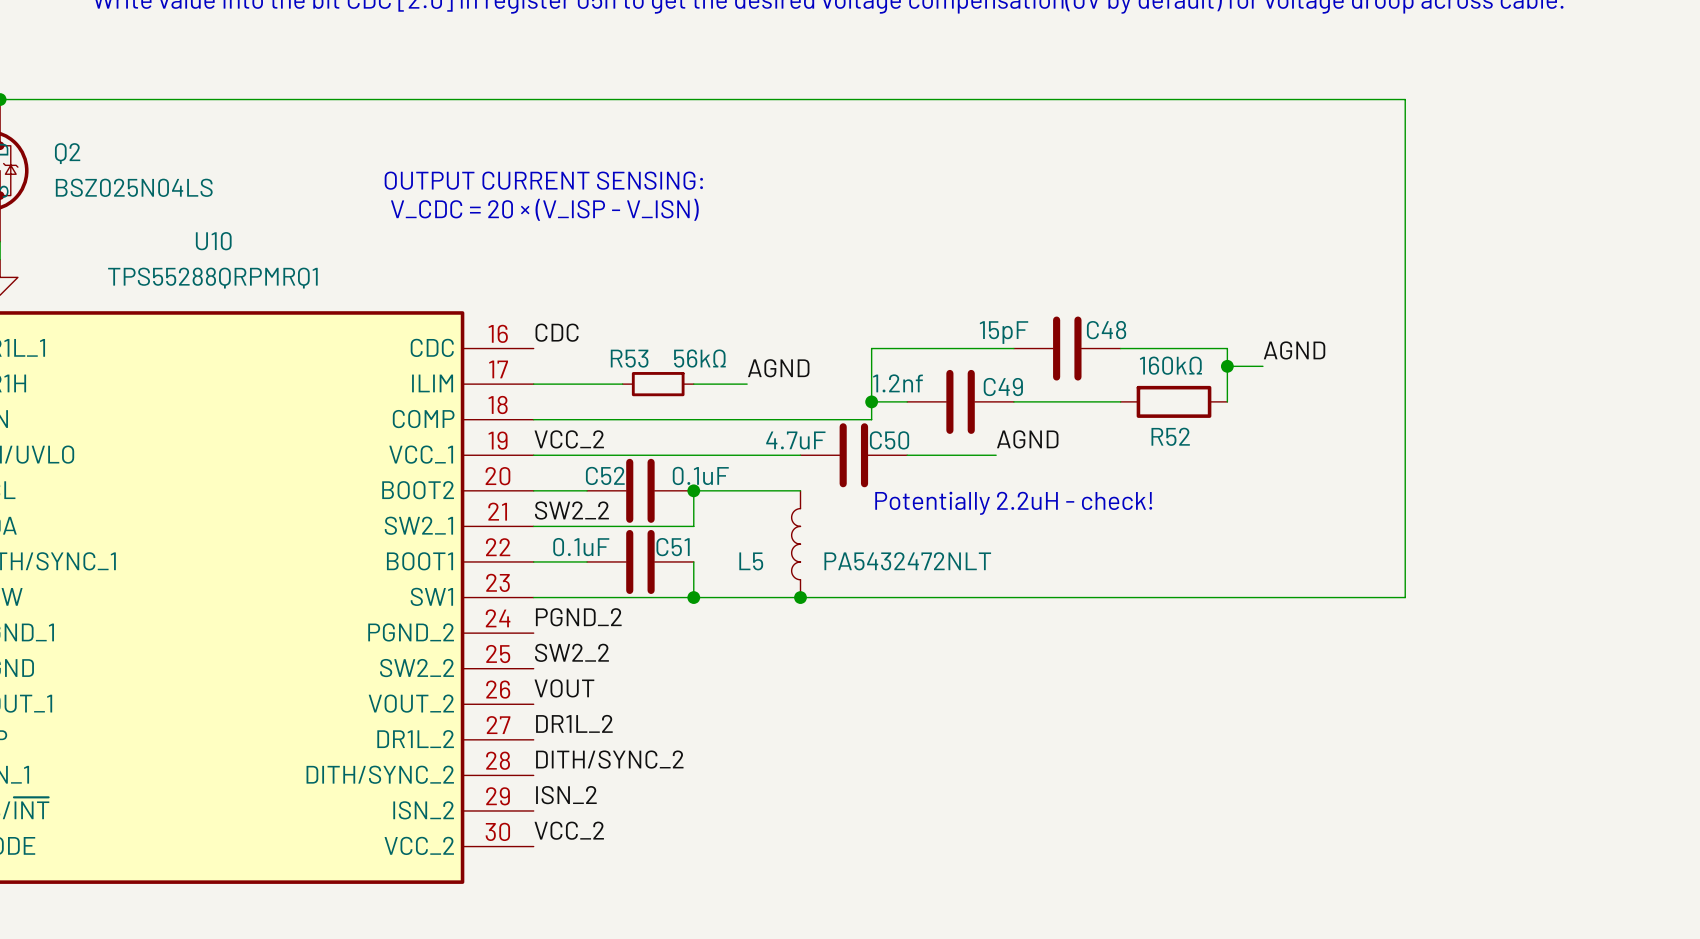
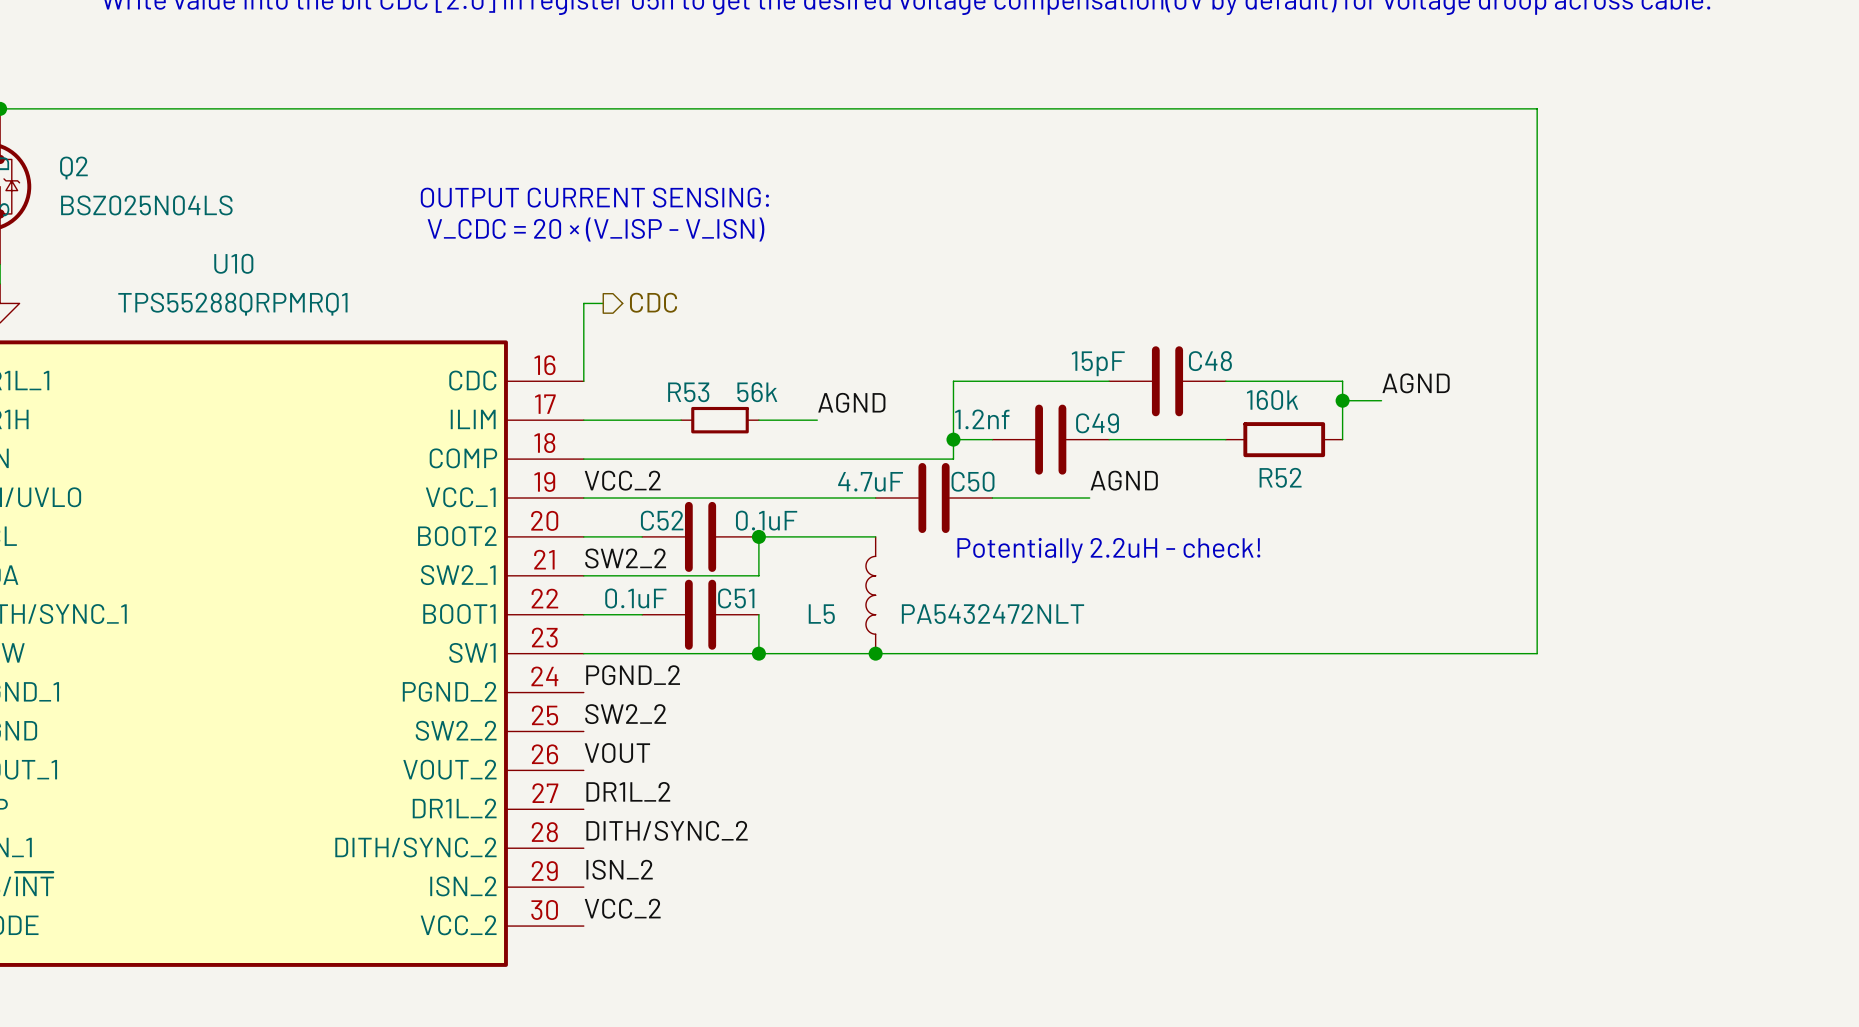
hierarchical label: none -> CDC (653, 302)
wire: none -> (603, 303) (583, 303) (583, 381)
label: CDC (557, 332) -> none
R53 value: 56kΩ (699, 358) -> 56k (757, 392)
R52 value: 160kΩ (1170, 365) -> 160k (1272, 400)

